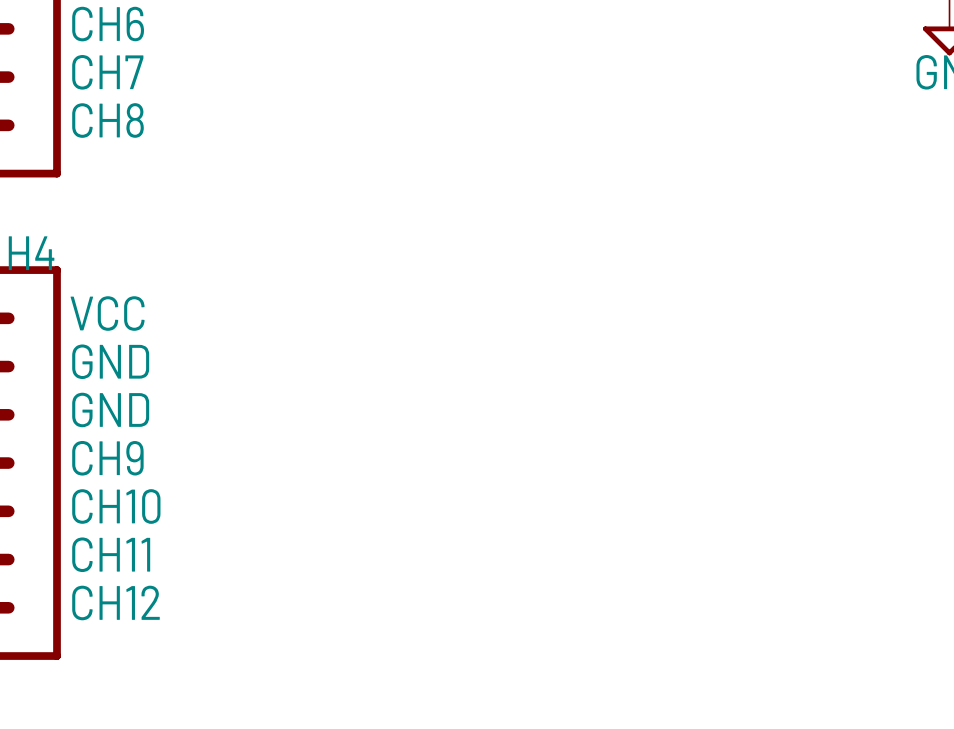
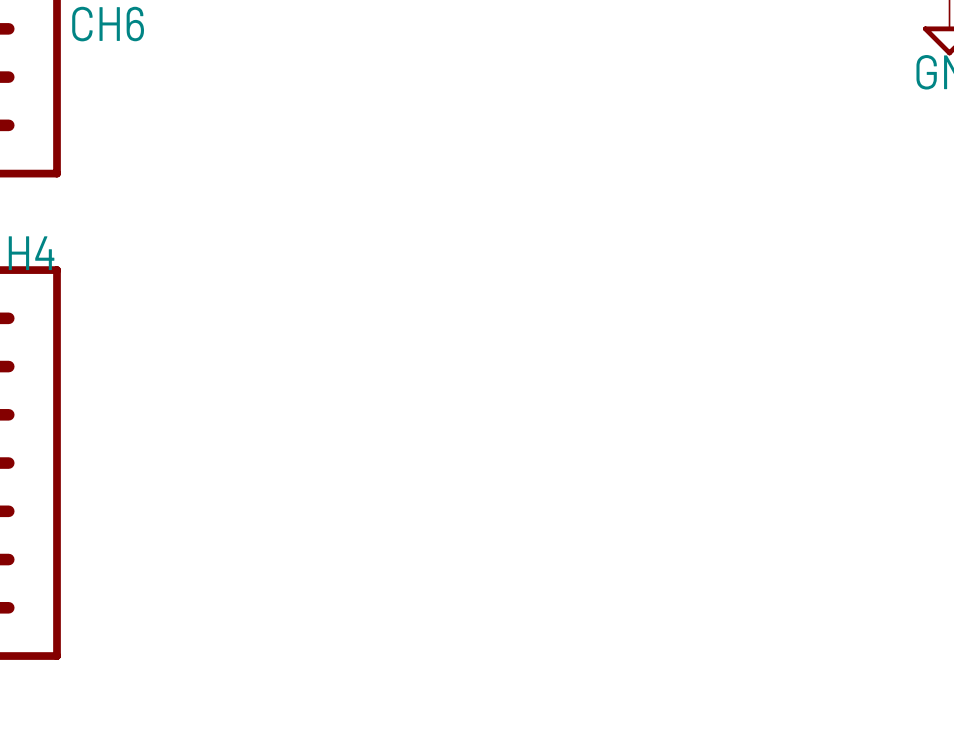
text: CH7 (107, 72) -> none
text: CH8 (107, 120) -> none
text: VCC (107, 313) -> none
text: GND (110, 361) -> none
text: GND (110, 409) -> none
text: CH9 (107, 458) -> none
text: CH10 (116, 506) -> none
text: CH11 (111, 554) -> none
text: CH12 (115, 602) -> none

